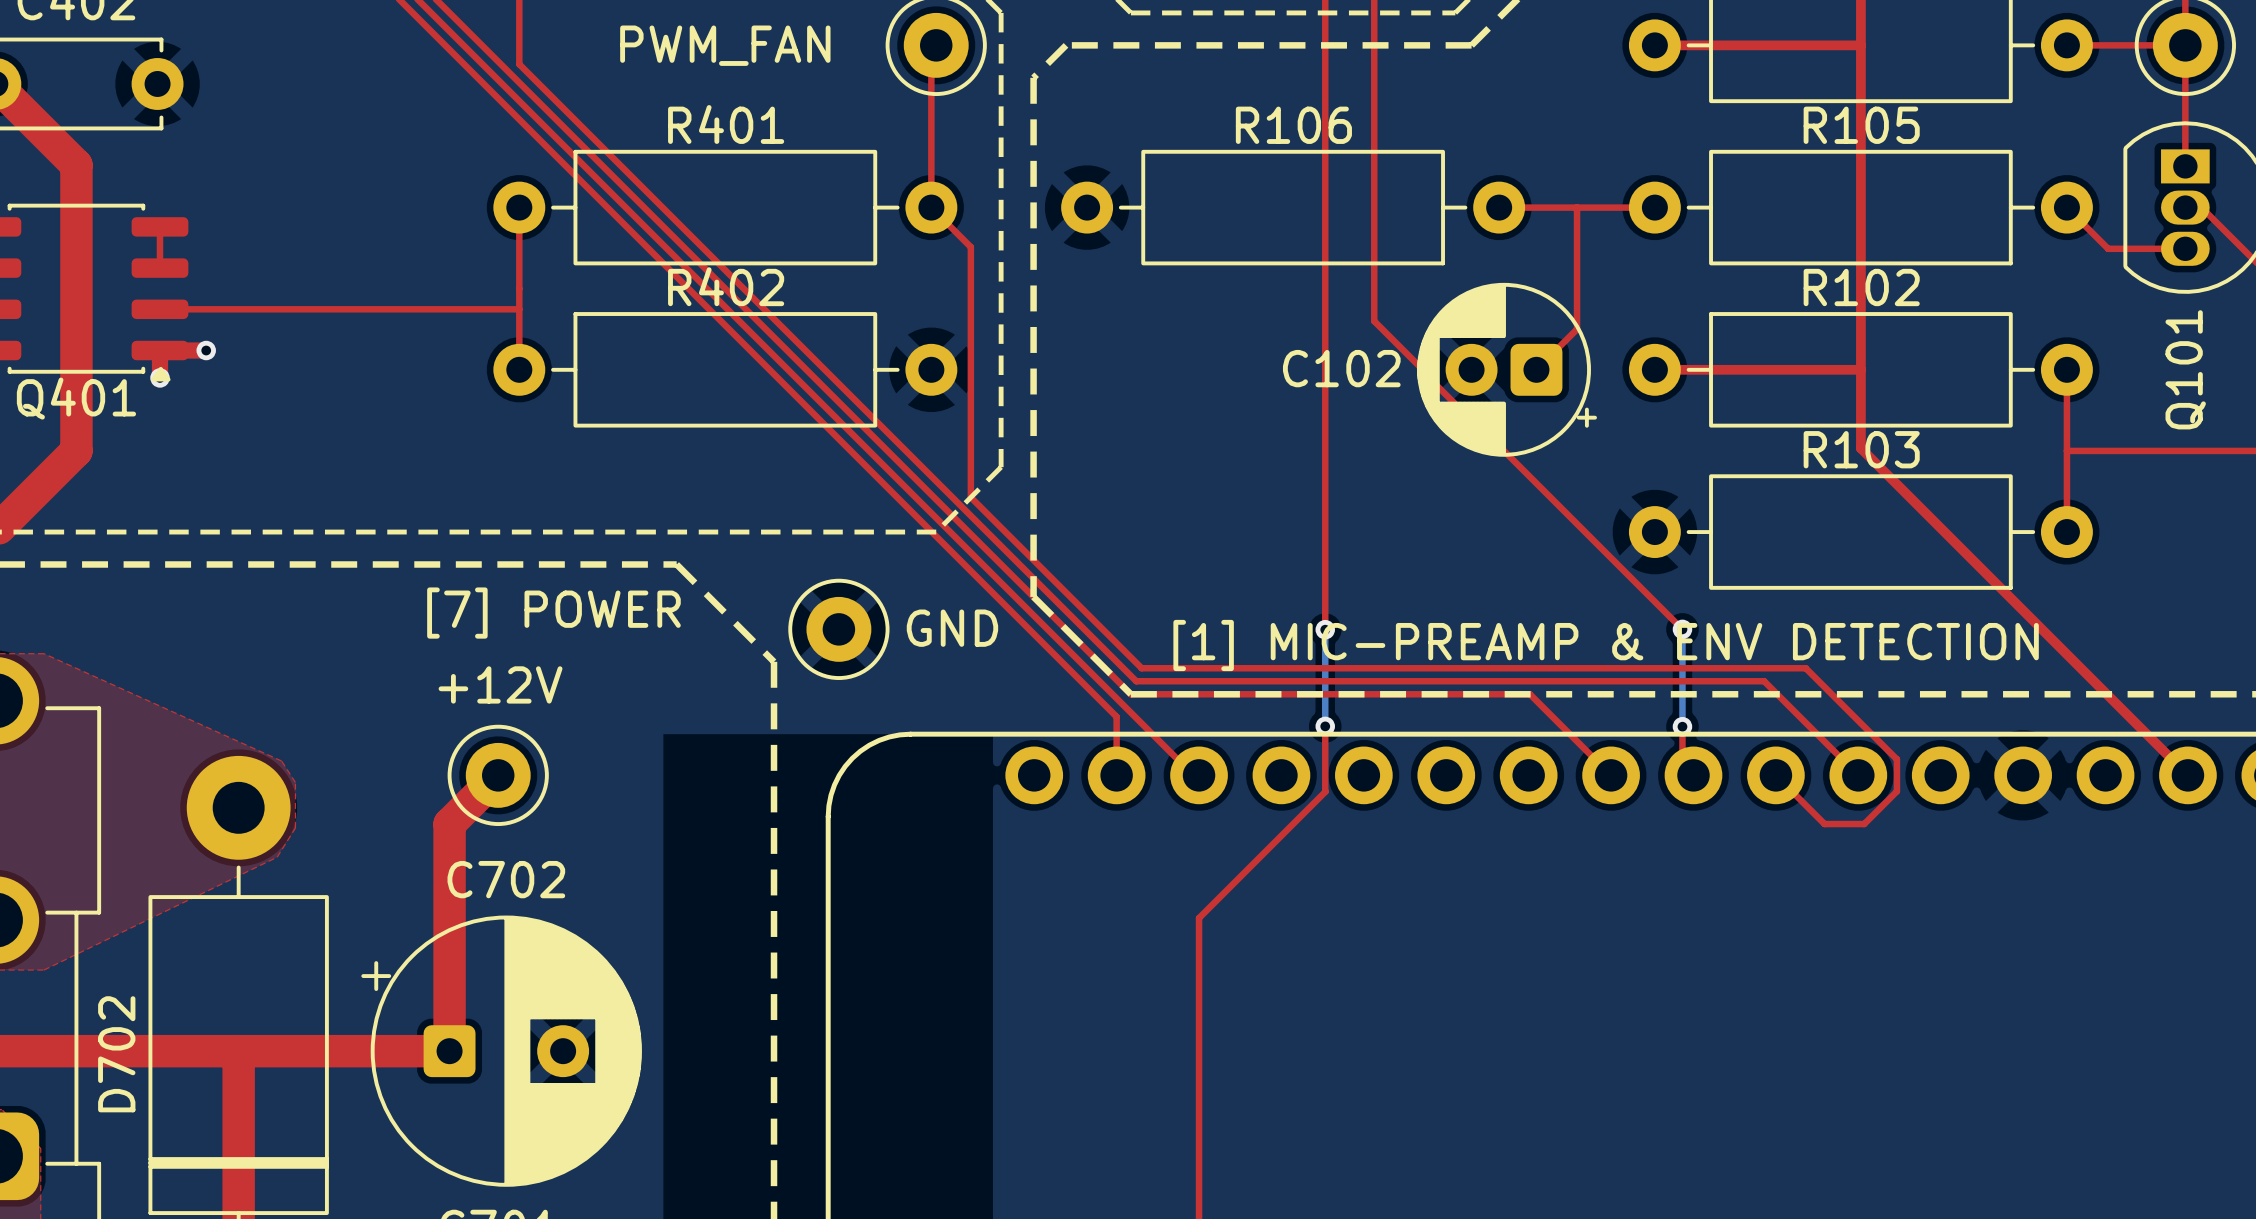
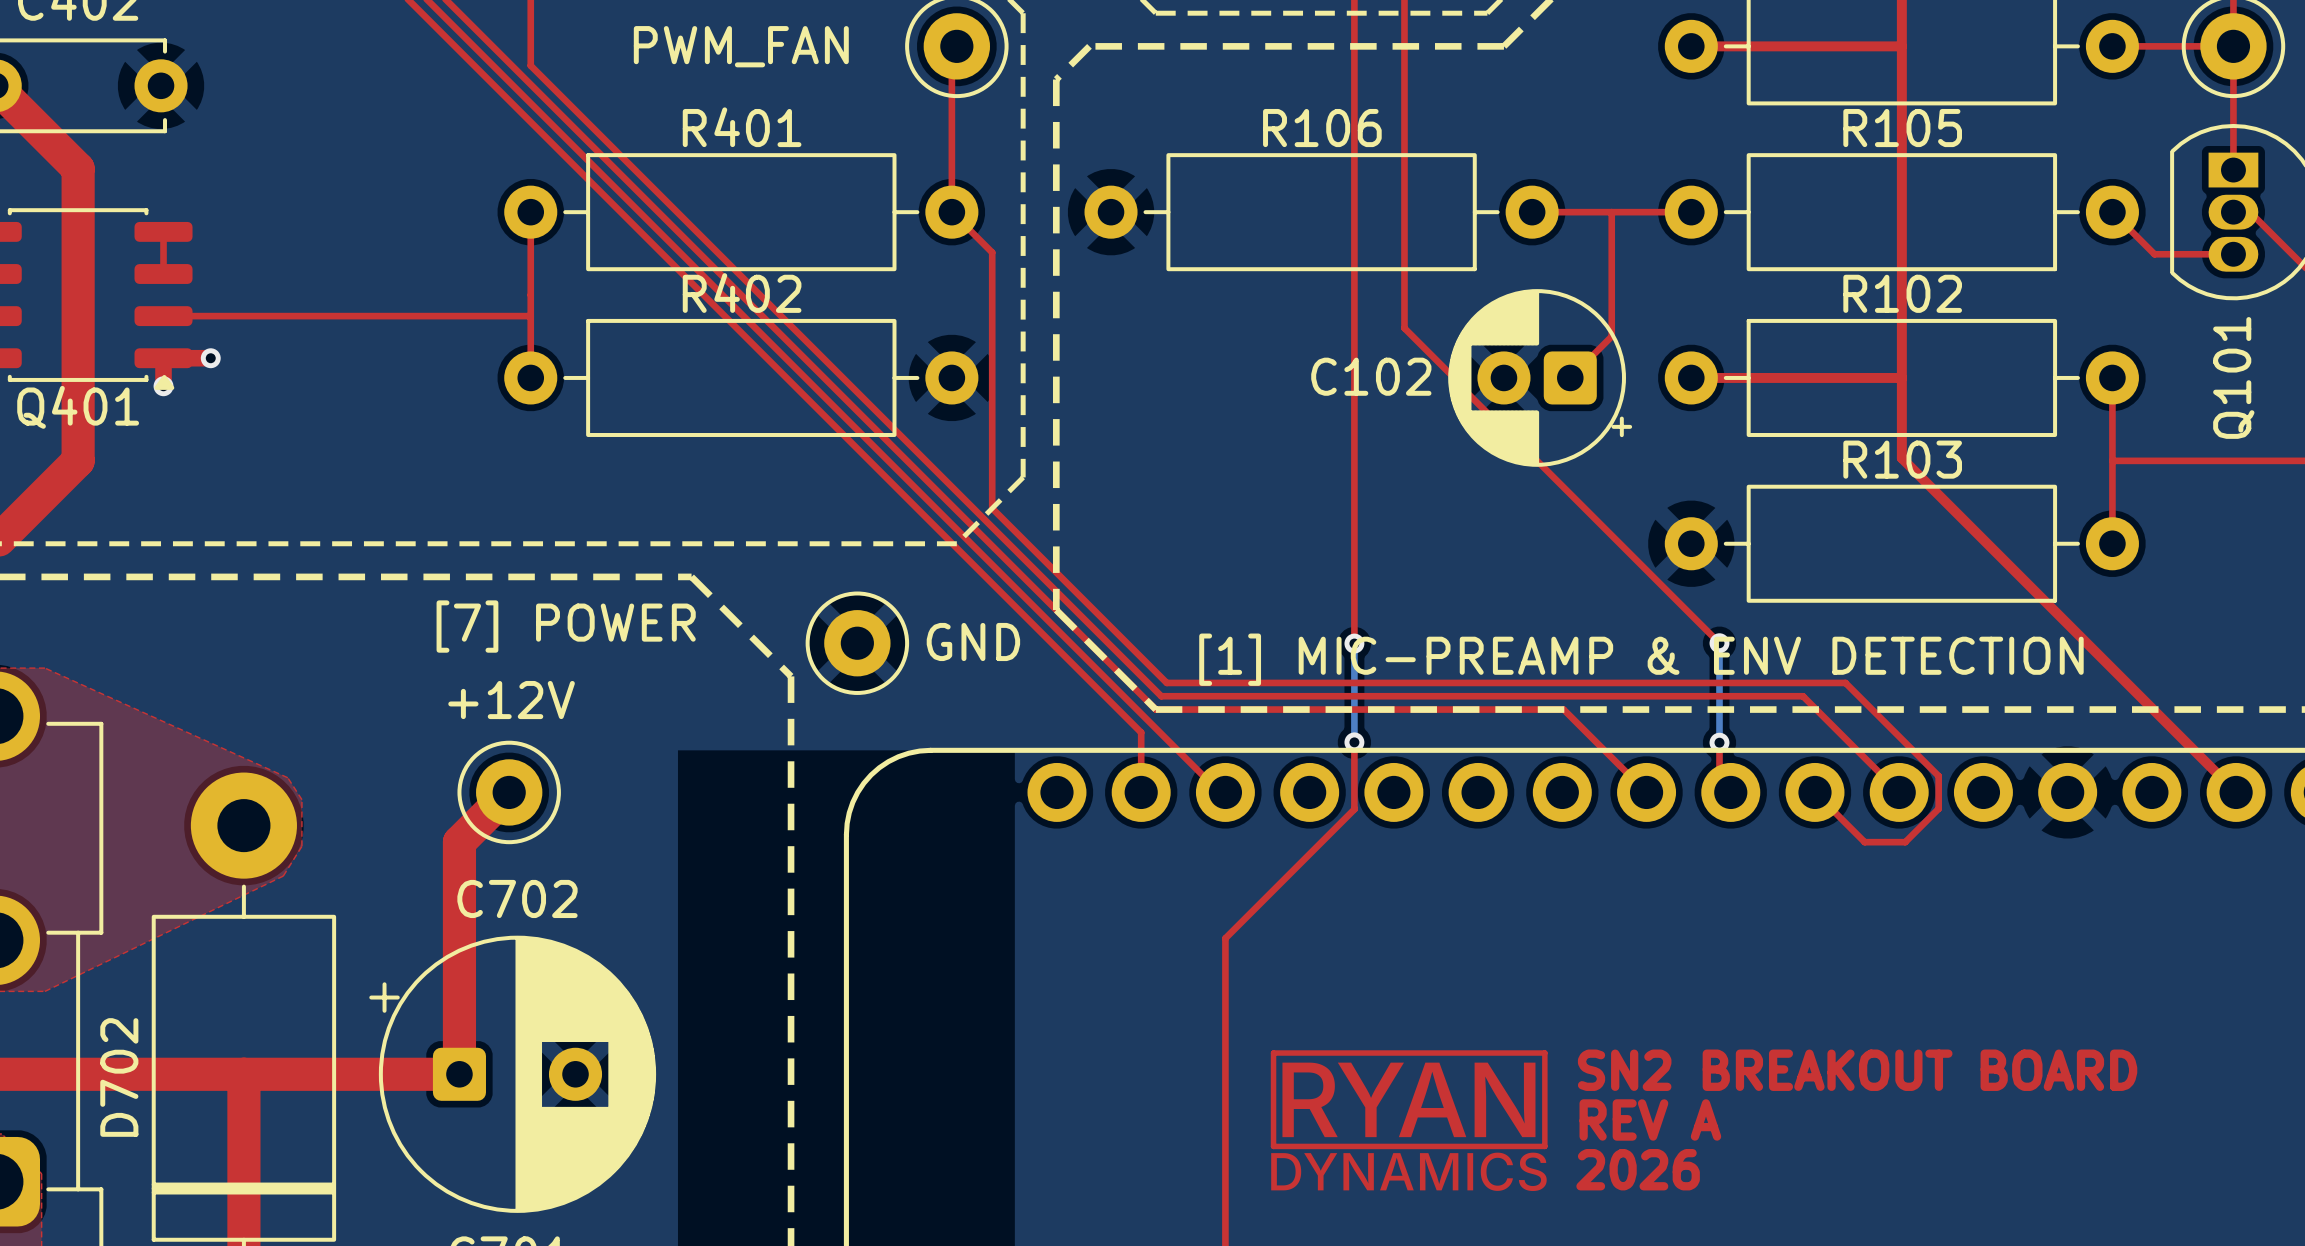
top track: none -> (1273, 1053) (1273, 1146) (1544, 1146) (1544, 1053) (1273, 1053)
drawing: none -> [1271, 1062, 1547, 1191]
text: none -> SN2 BREAKOUT BOARD (1857, 1070)
text: none -> REV (1623, 1119)
text: none -> A (1706, 1119)
text: none -> 2026 (1638, 1169)

